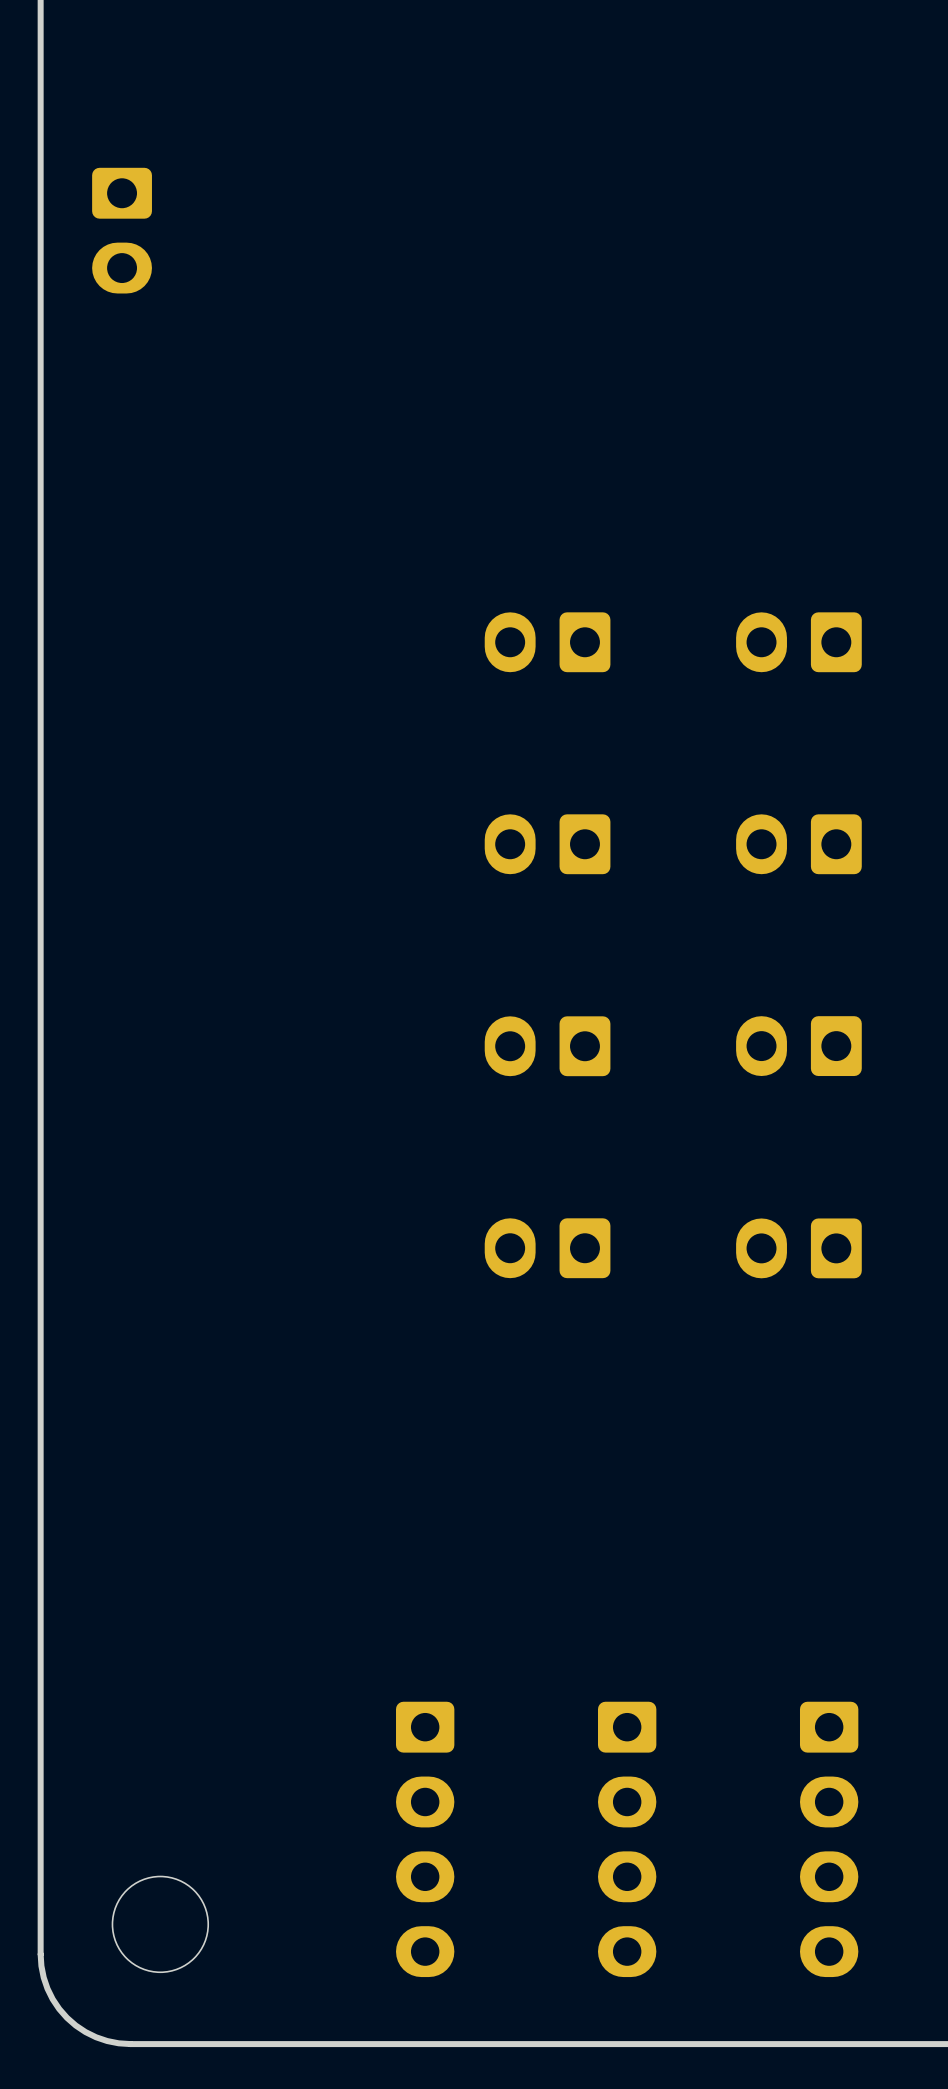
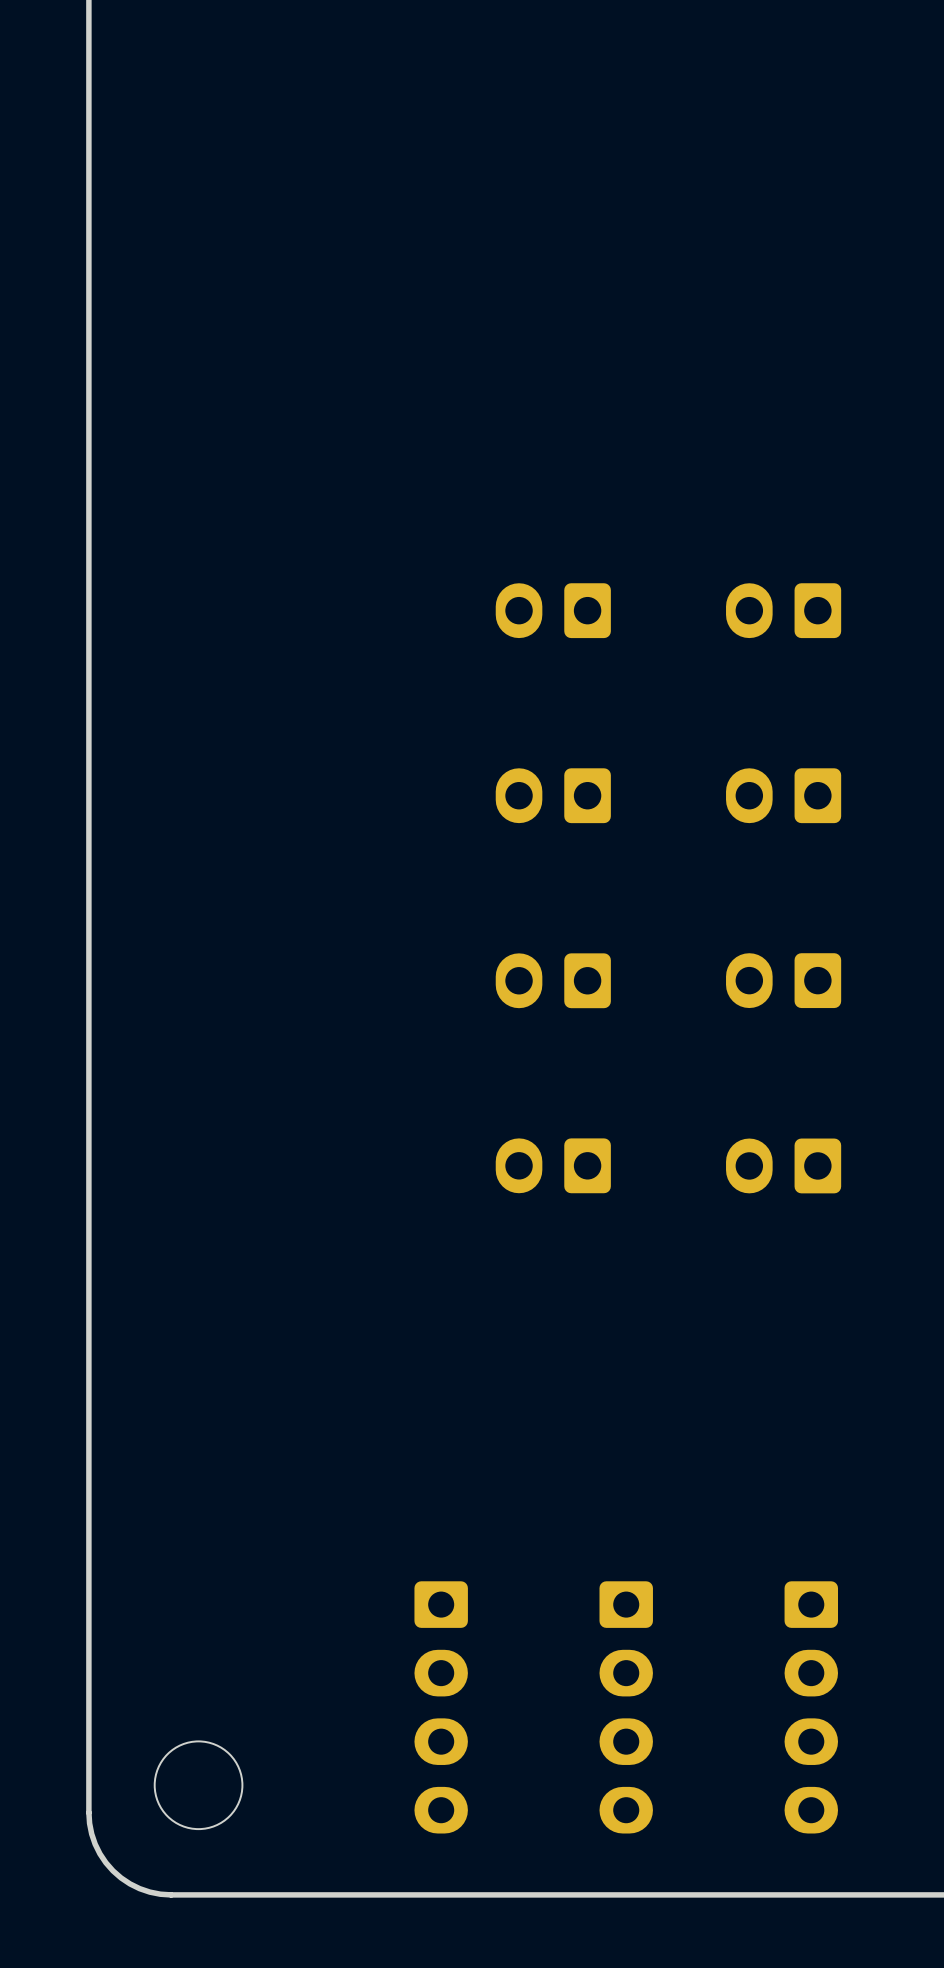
part: (122, 230) -> none

